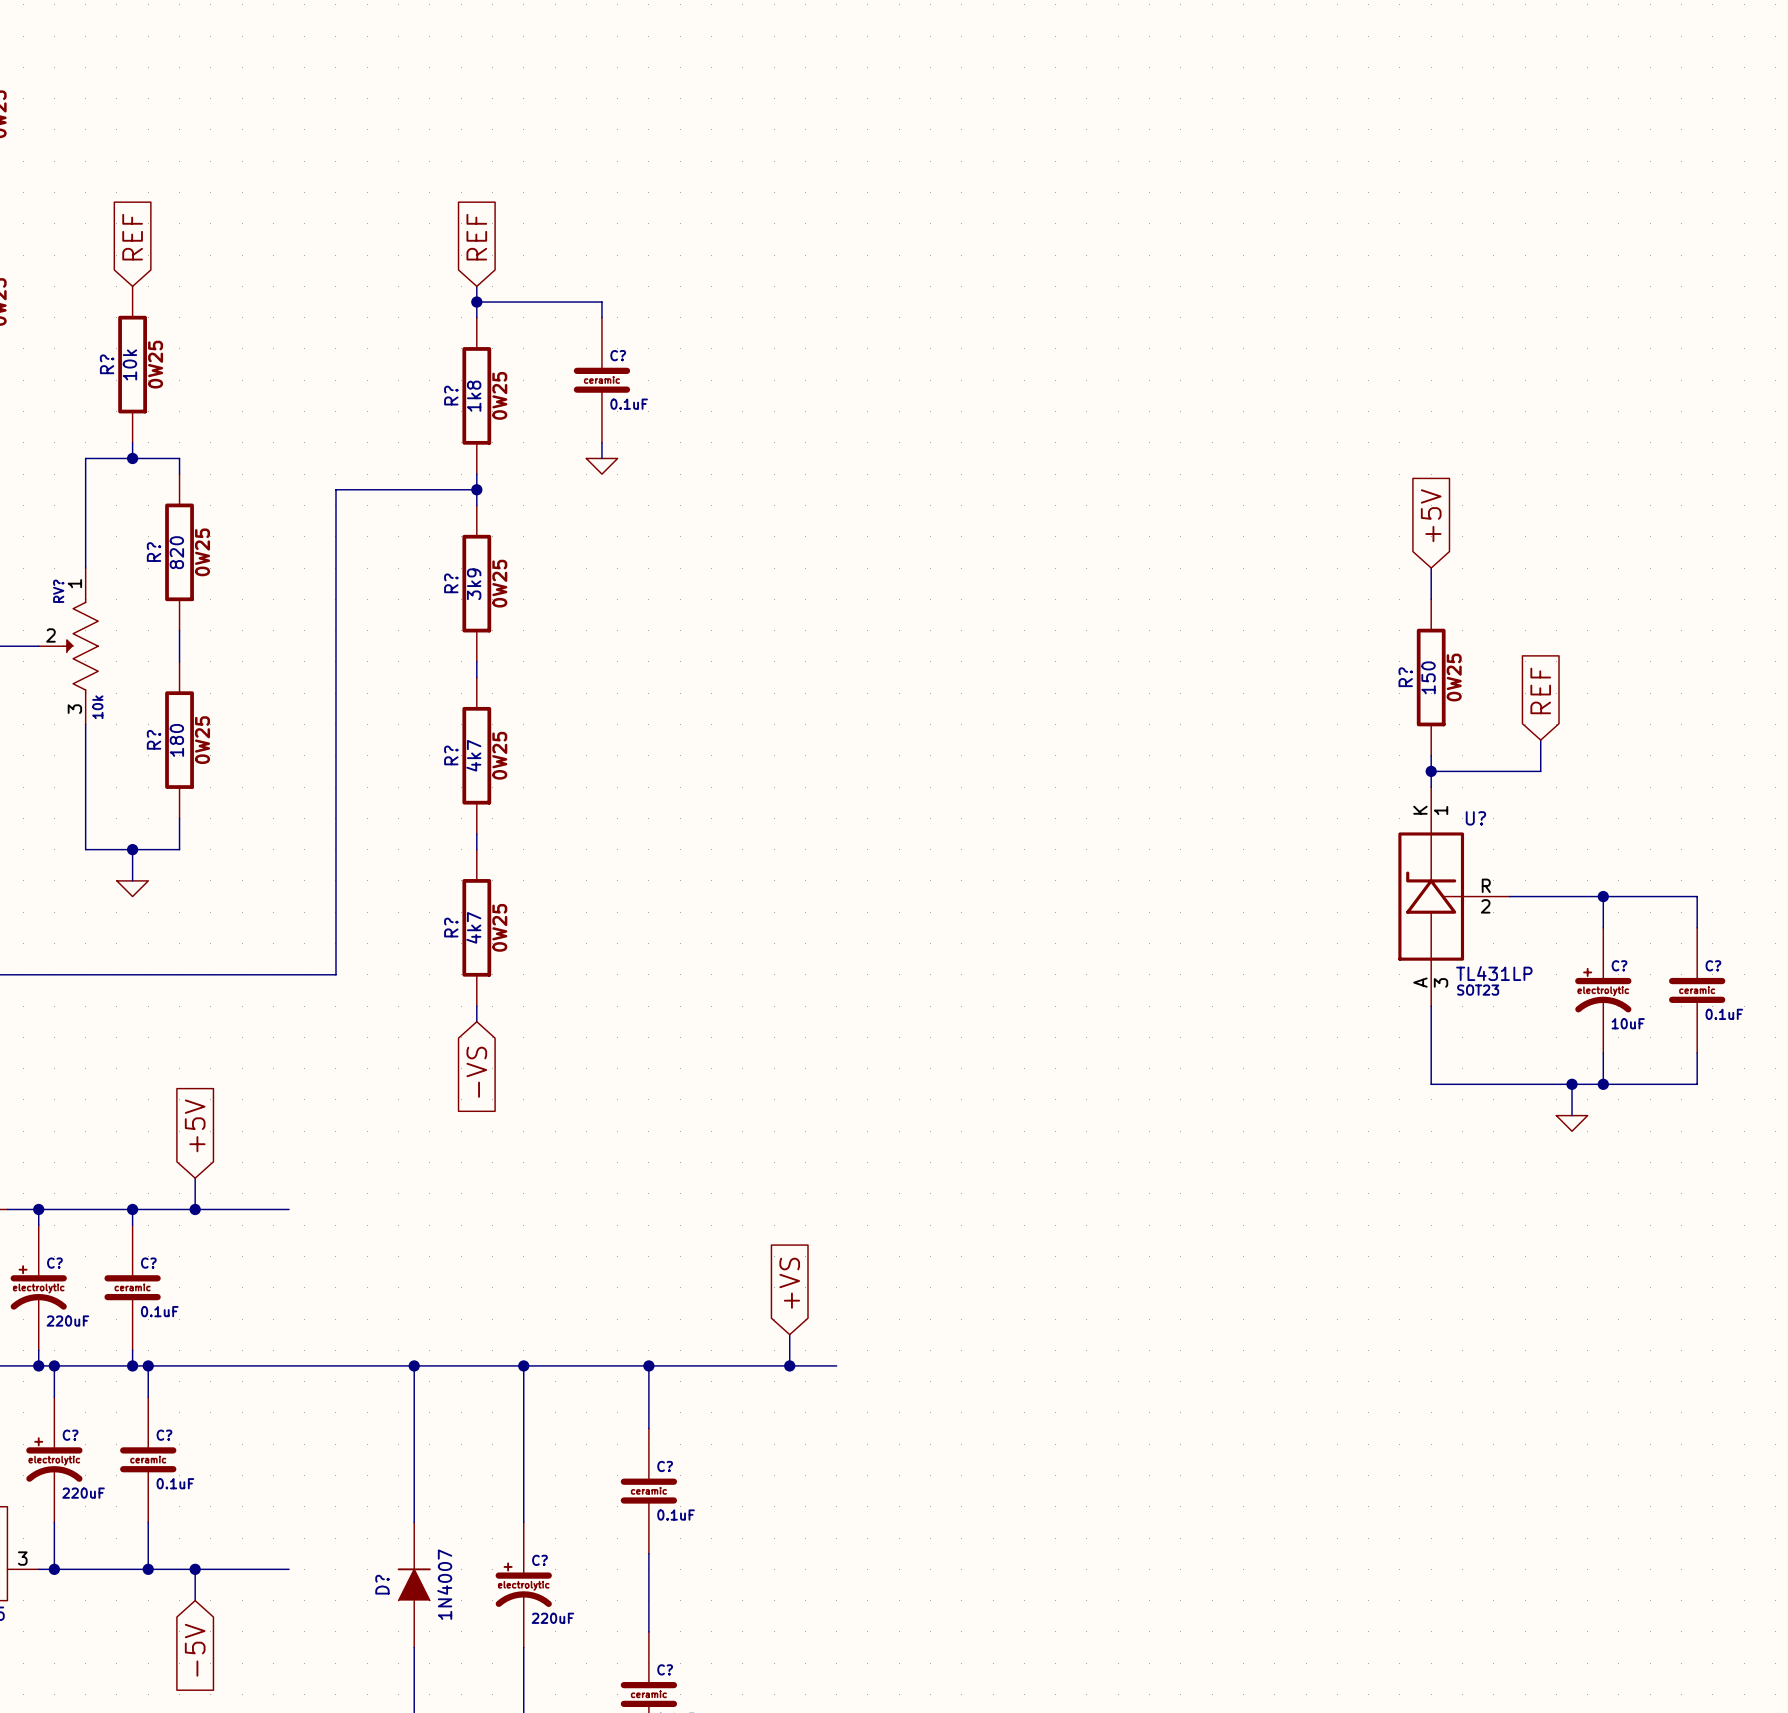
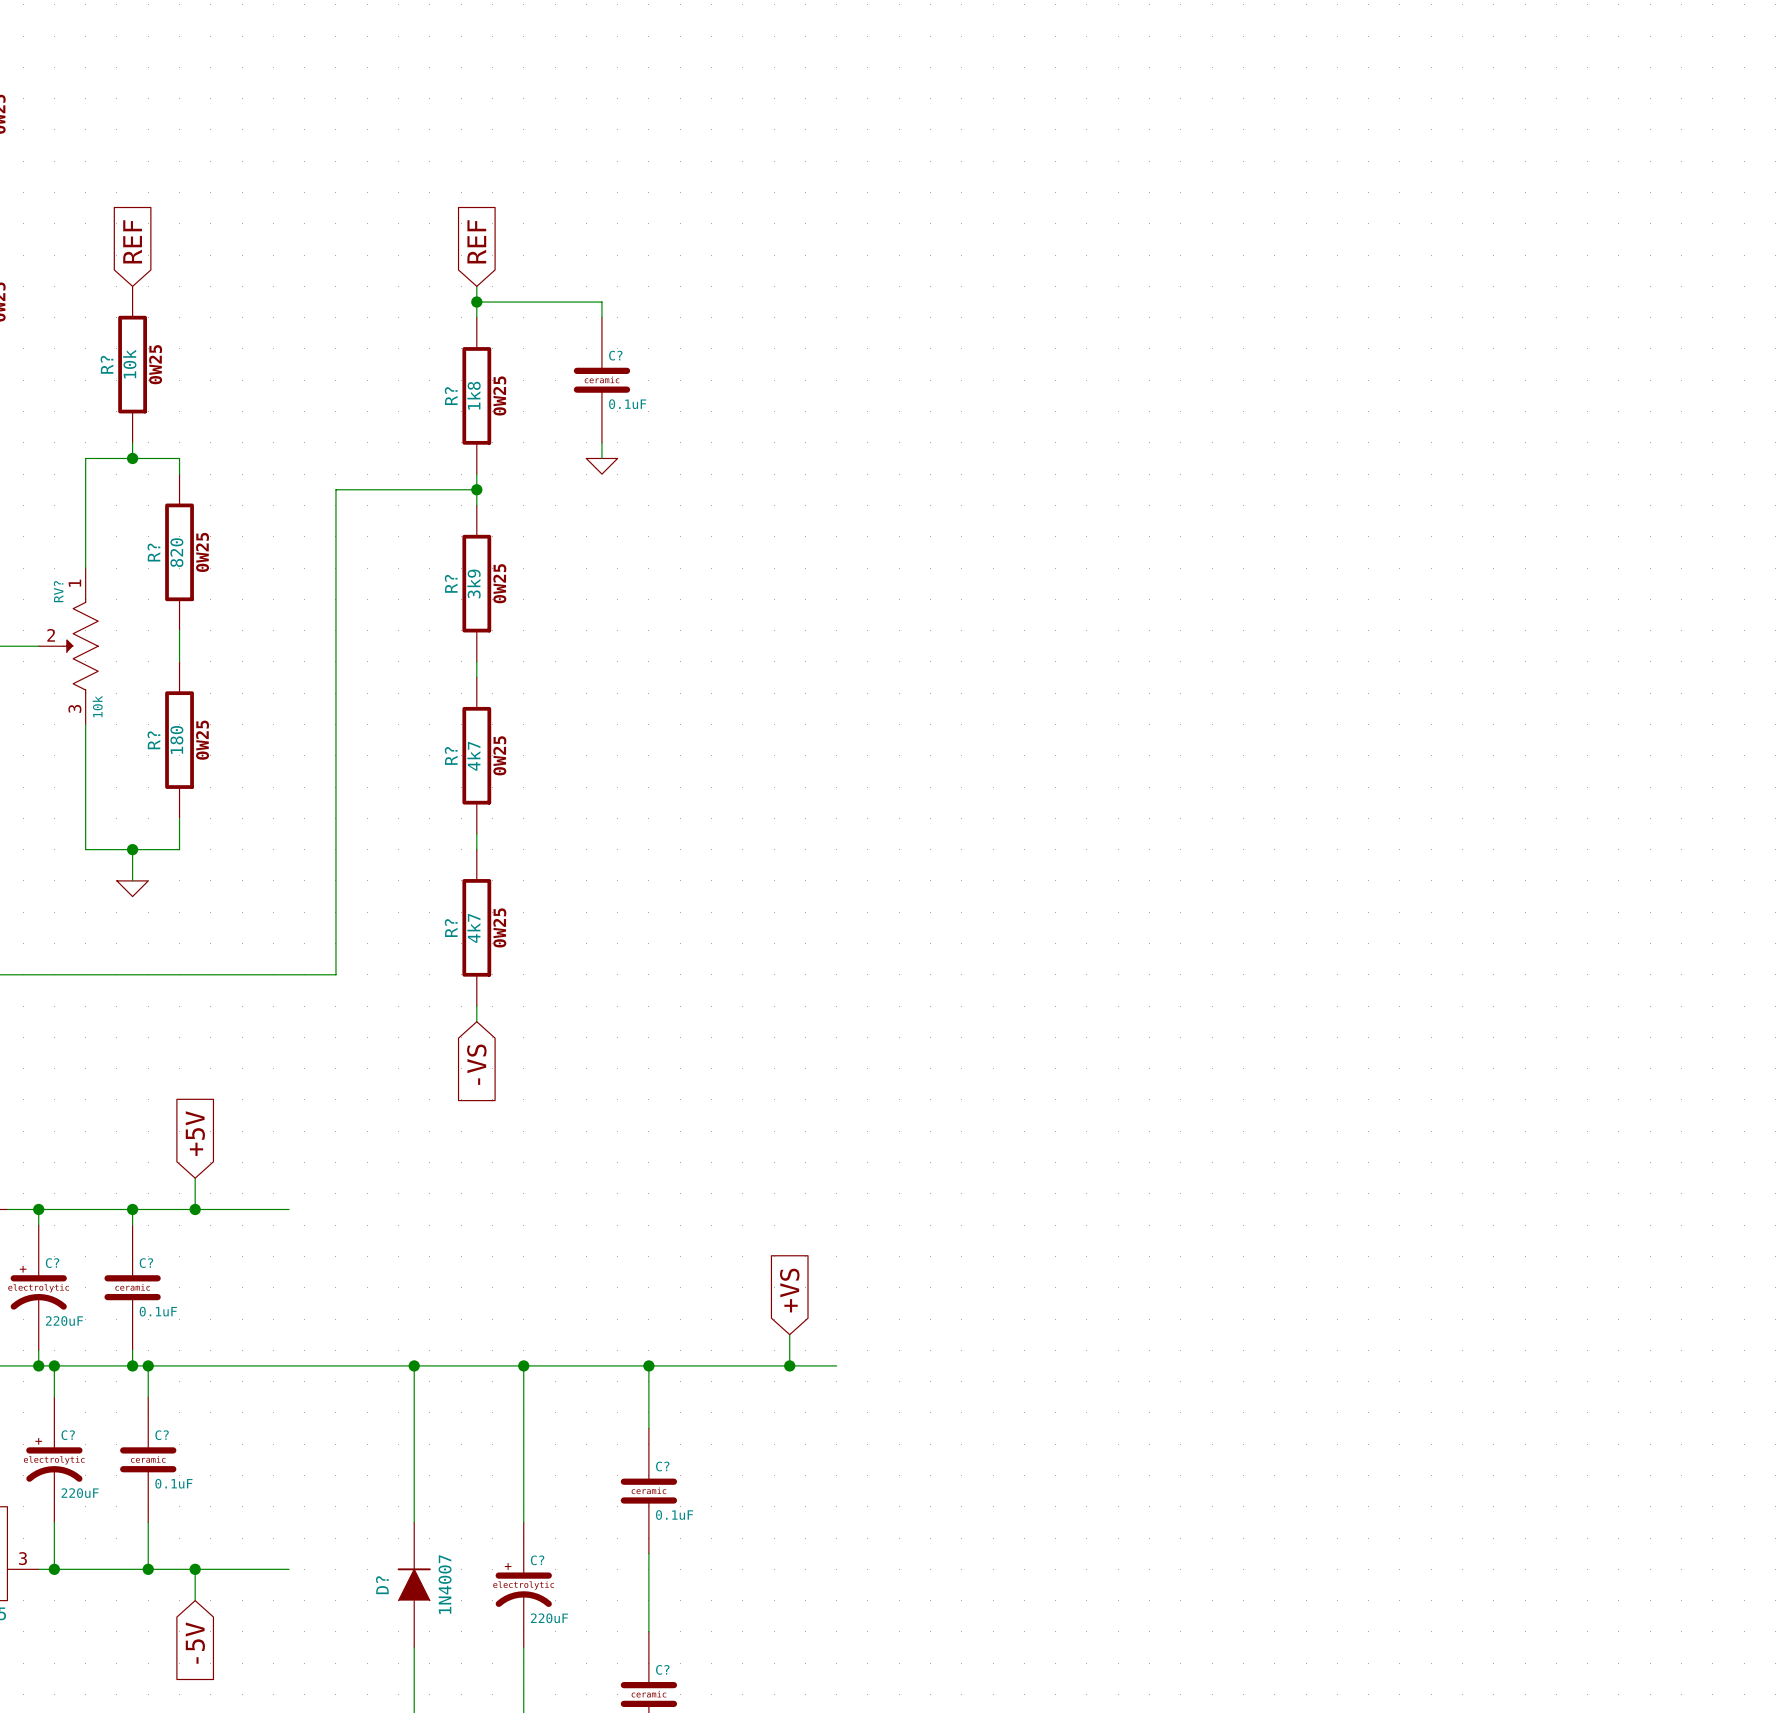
global label: +5V (1431, 515) -> none
wire: (1431, 568) (1431, 599) -> none
R?: 150 (1431, 677) -> none
global label: REF (1540, 690) -> none
wire: (1540, 740) (1540, 771) (1431, 771) -> none
wire: (1431, 755) (1431, 787) -> none
junction: (1431, 771) -> none
U?: TL431LP (1453, 896) -> none
wire: (1509, 896) (1697, 896) (1697, 927) -> none
wire: (1603, 896) (1603, 927) -> none
junction: (1603, 896) -> none
C?: 10uF (1603, 990) -> none
C?: 0.1uF (1697, 990) -> none
wire: (1431, 1006) (1431, 1084) (1697, 1084) (1697, 1053) -> none
wire: (1603, 1053) (1603, 1084) -> none
wire: (1572, 1084) (1572, 1115) -> none
junction: (1572, 1084) -> none
junction: (1603, 1084) -> none
power symbol: (1572, 1123) -> none

